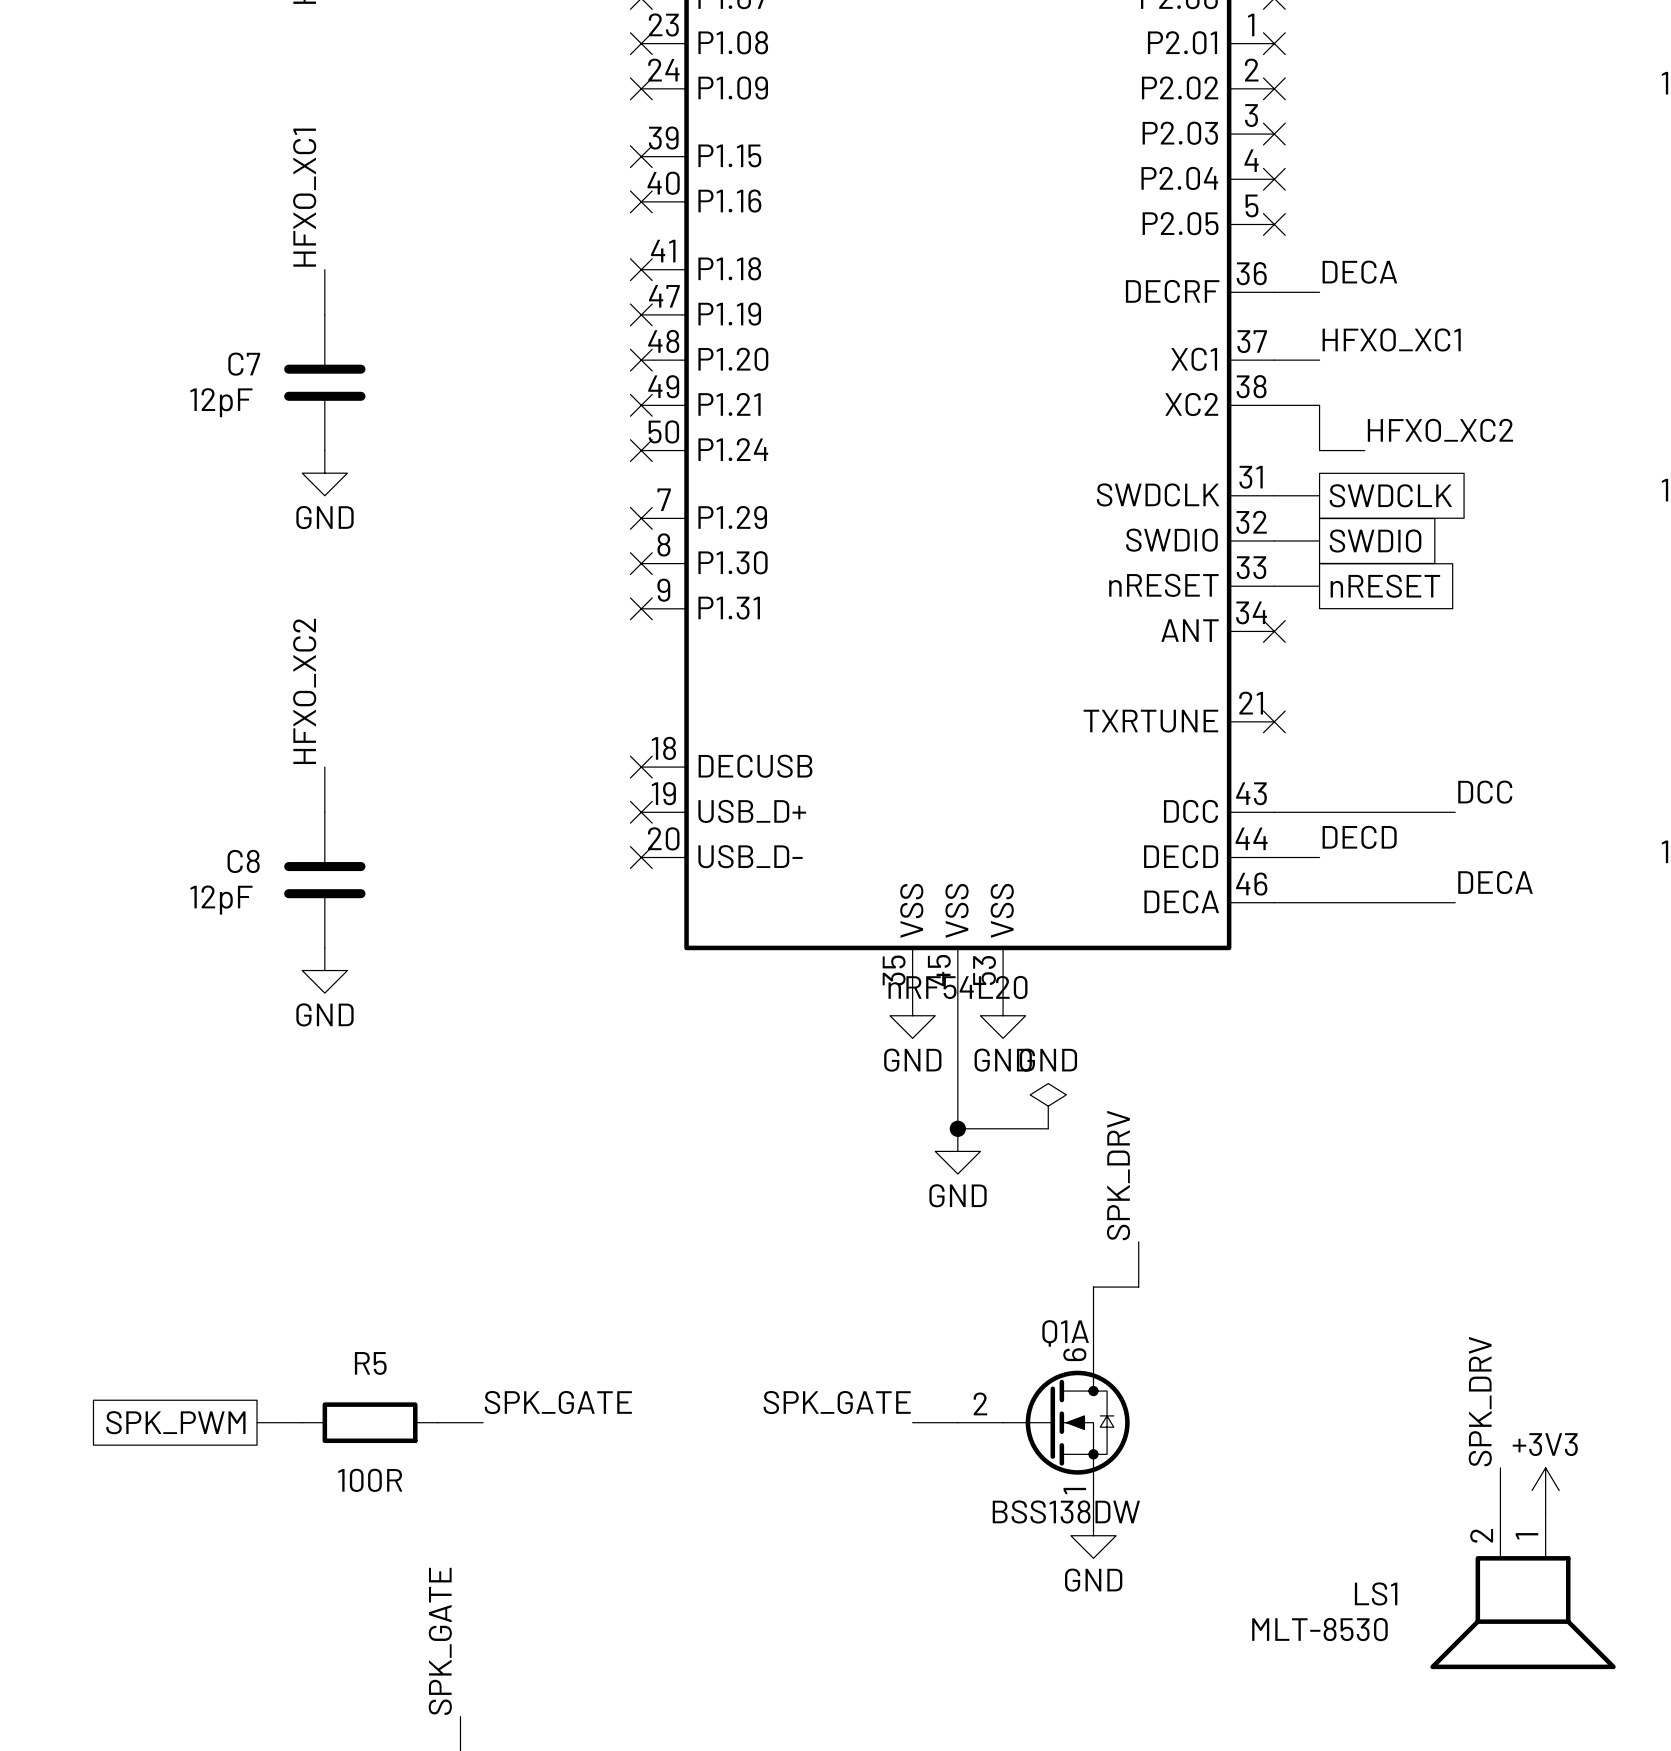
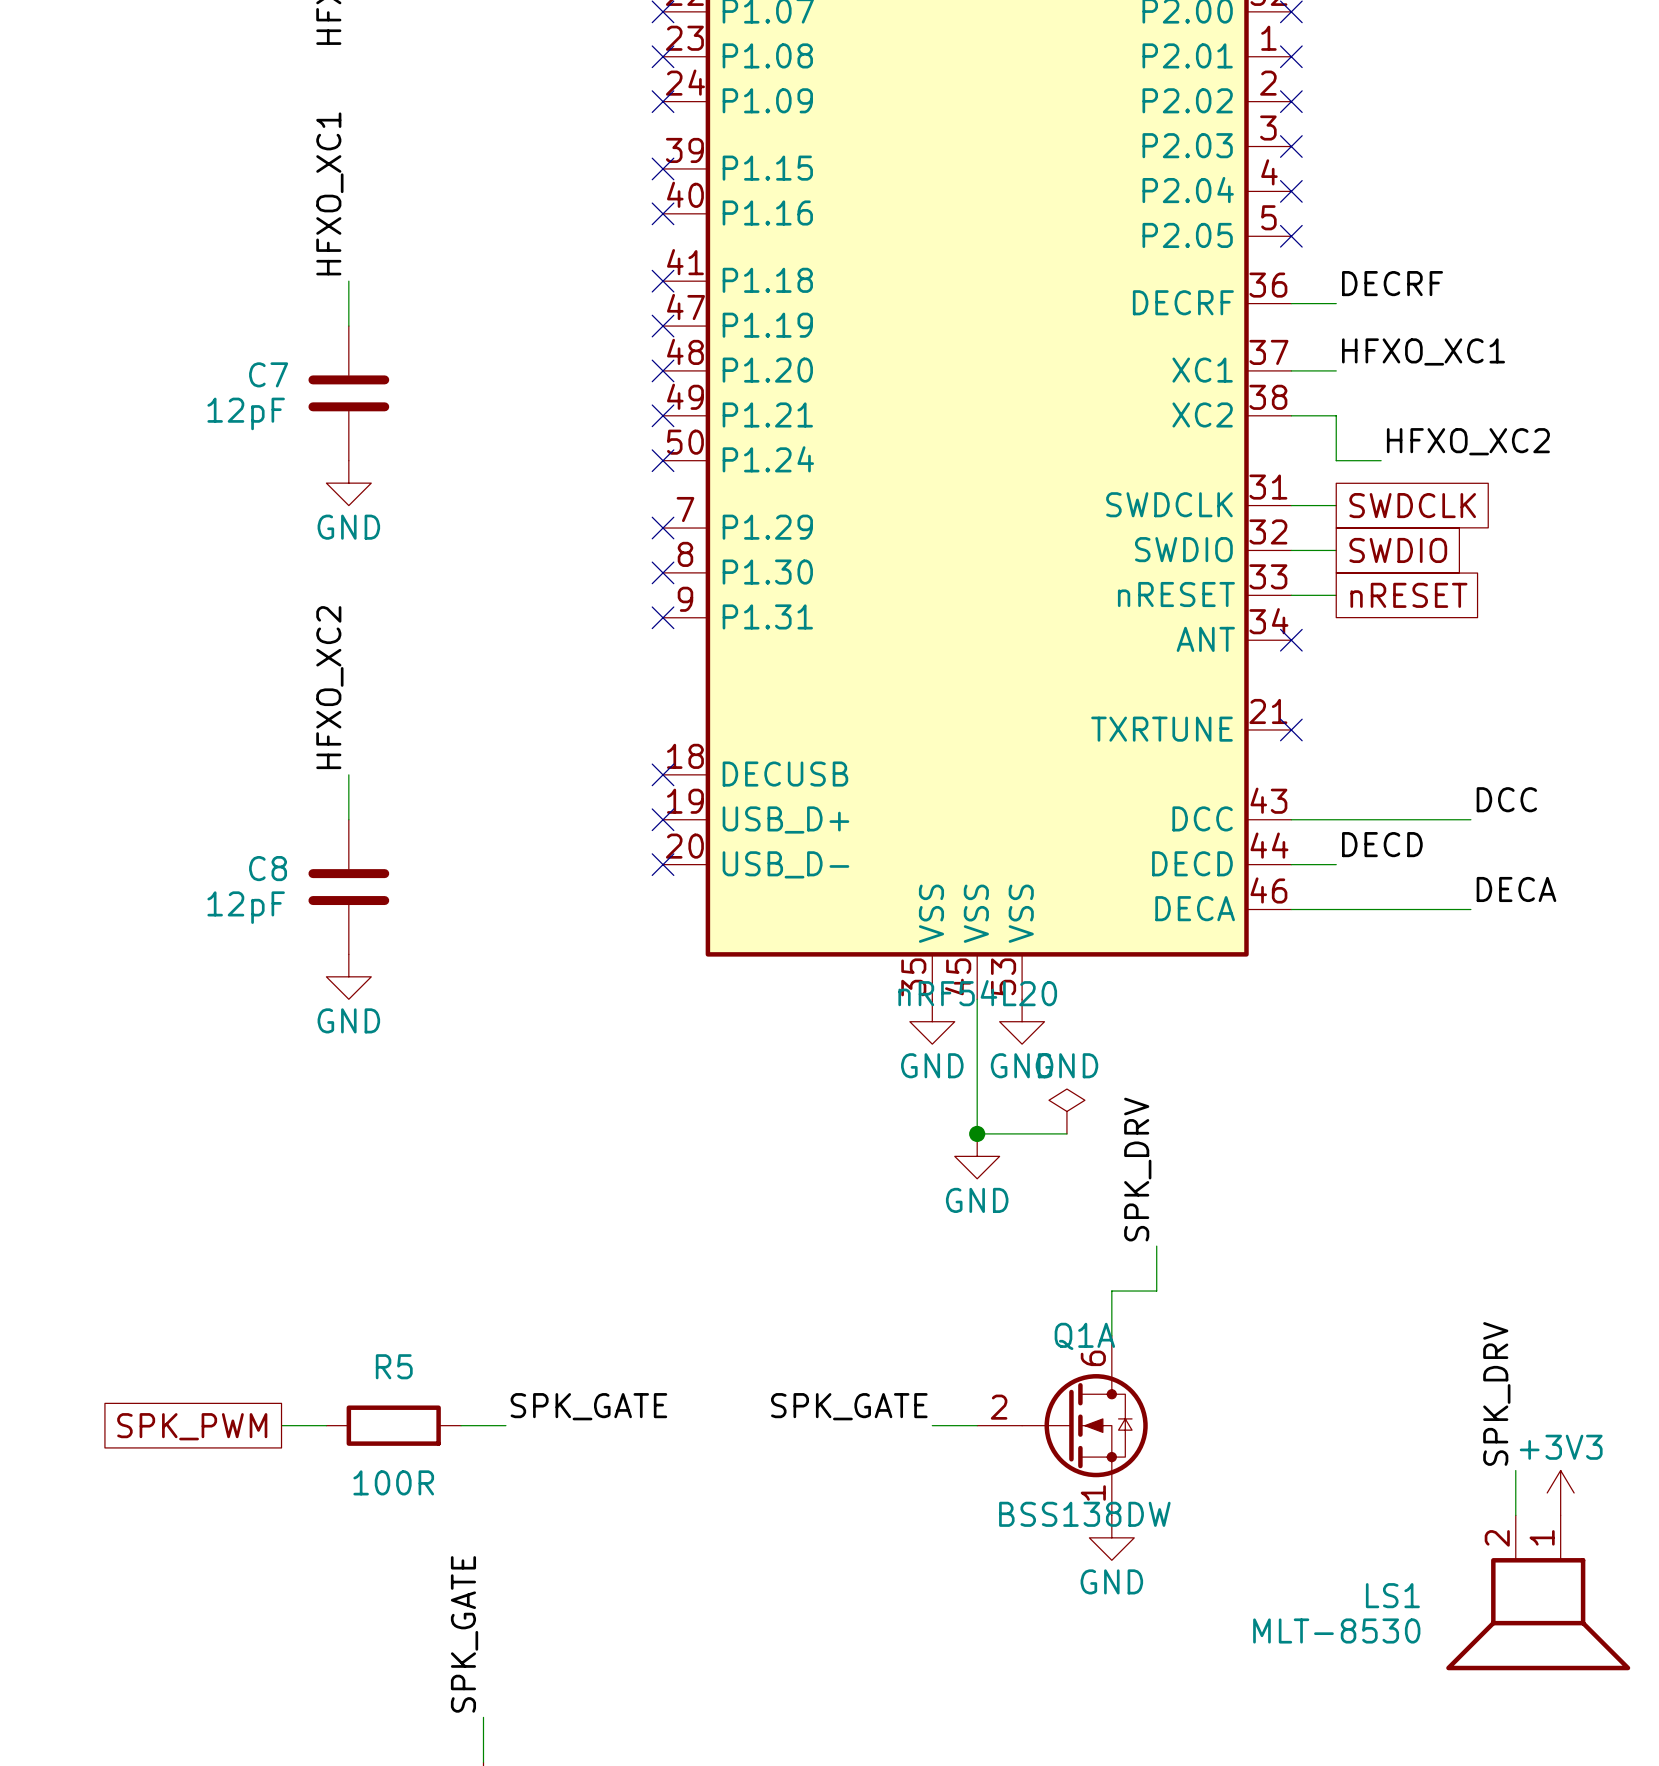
label: DECA (1359, 272) -> DECRF (1392, 283)

